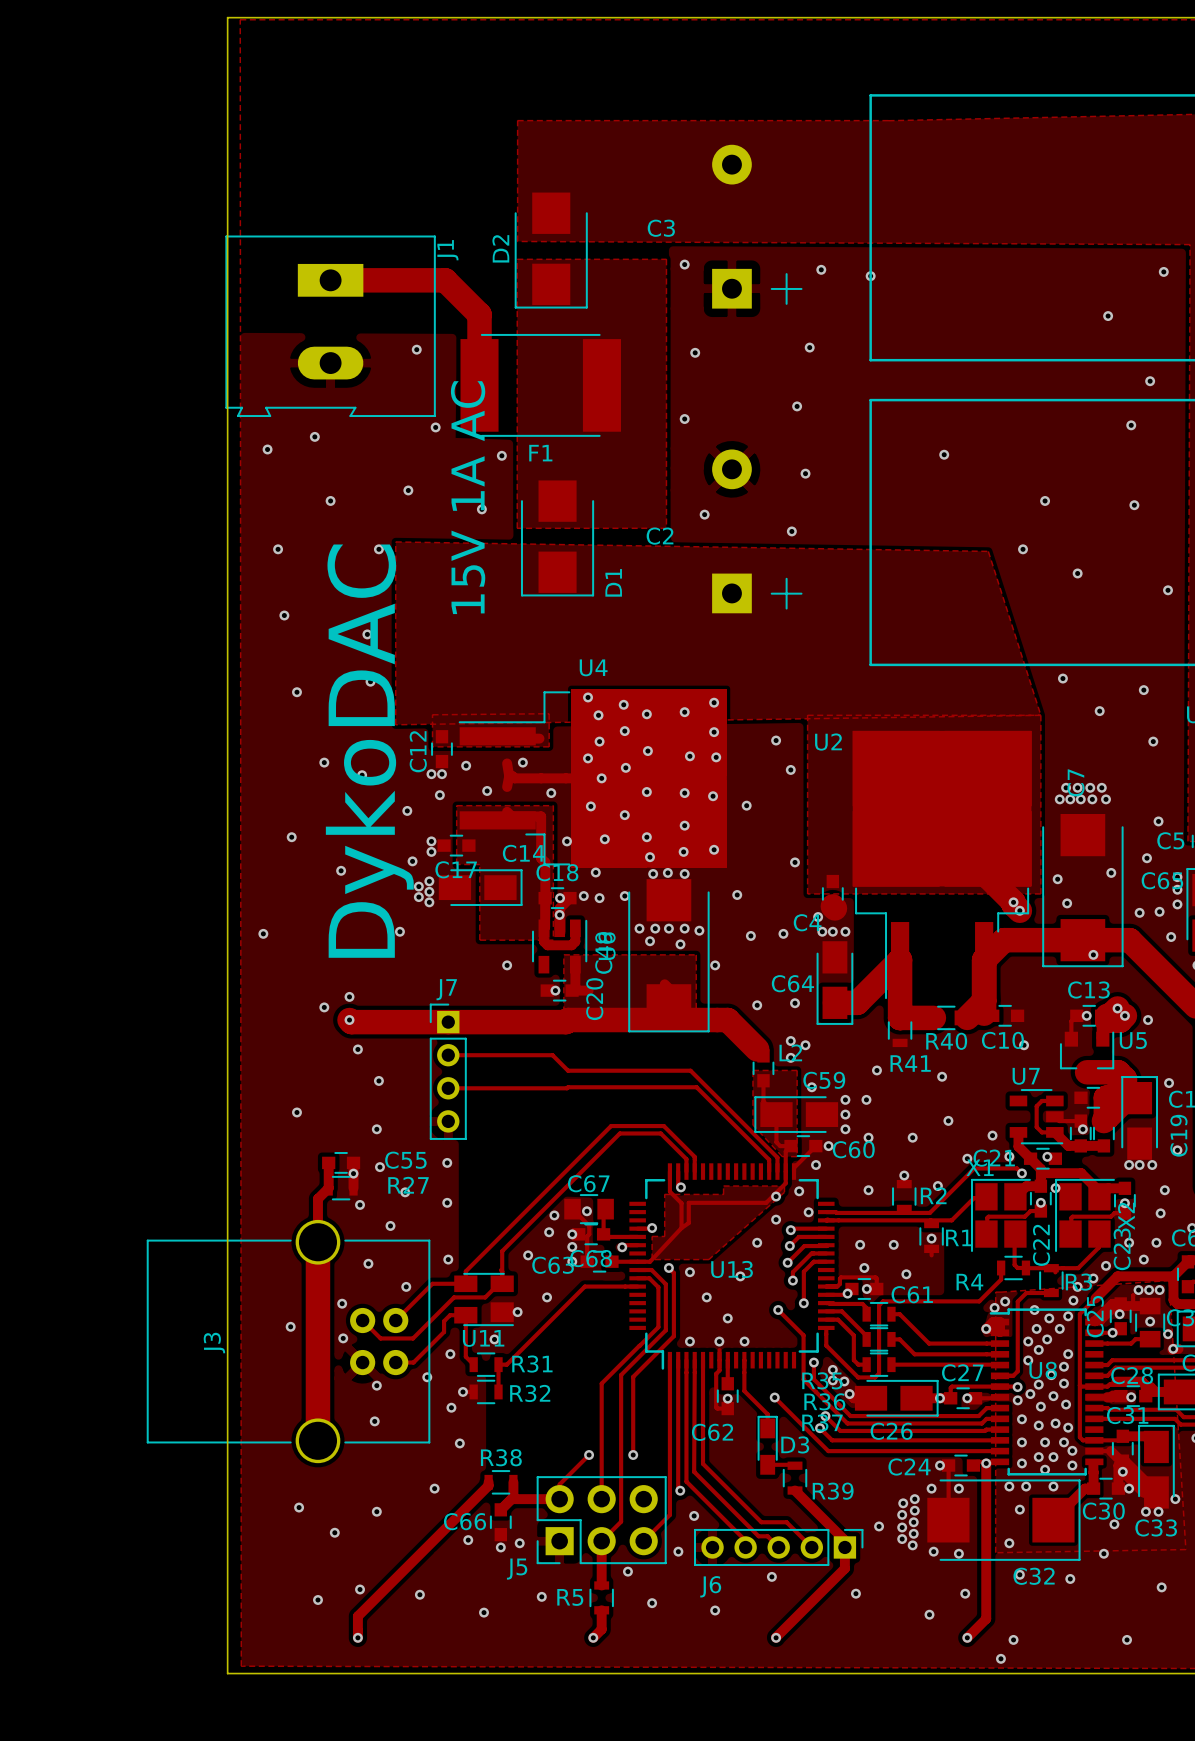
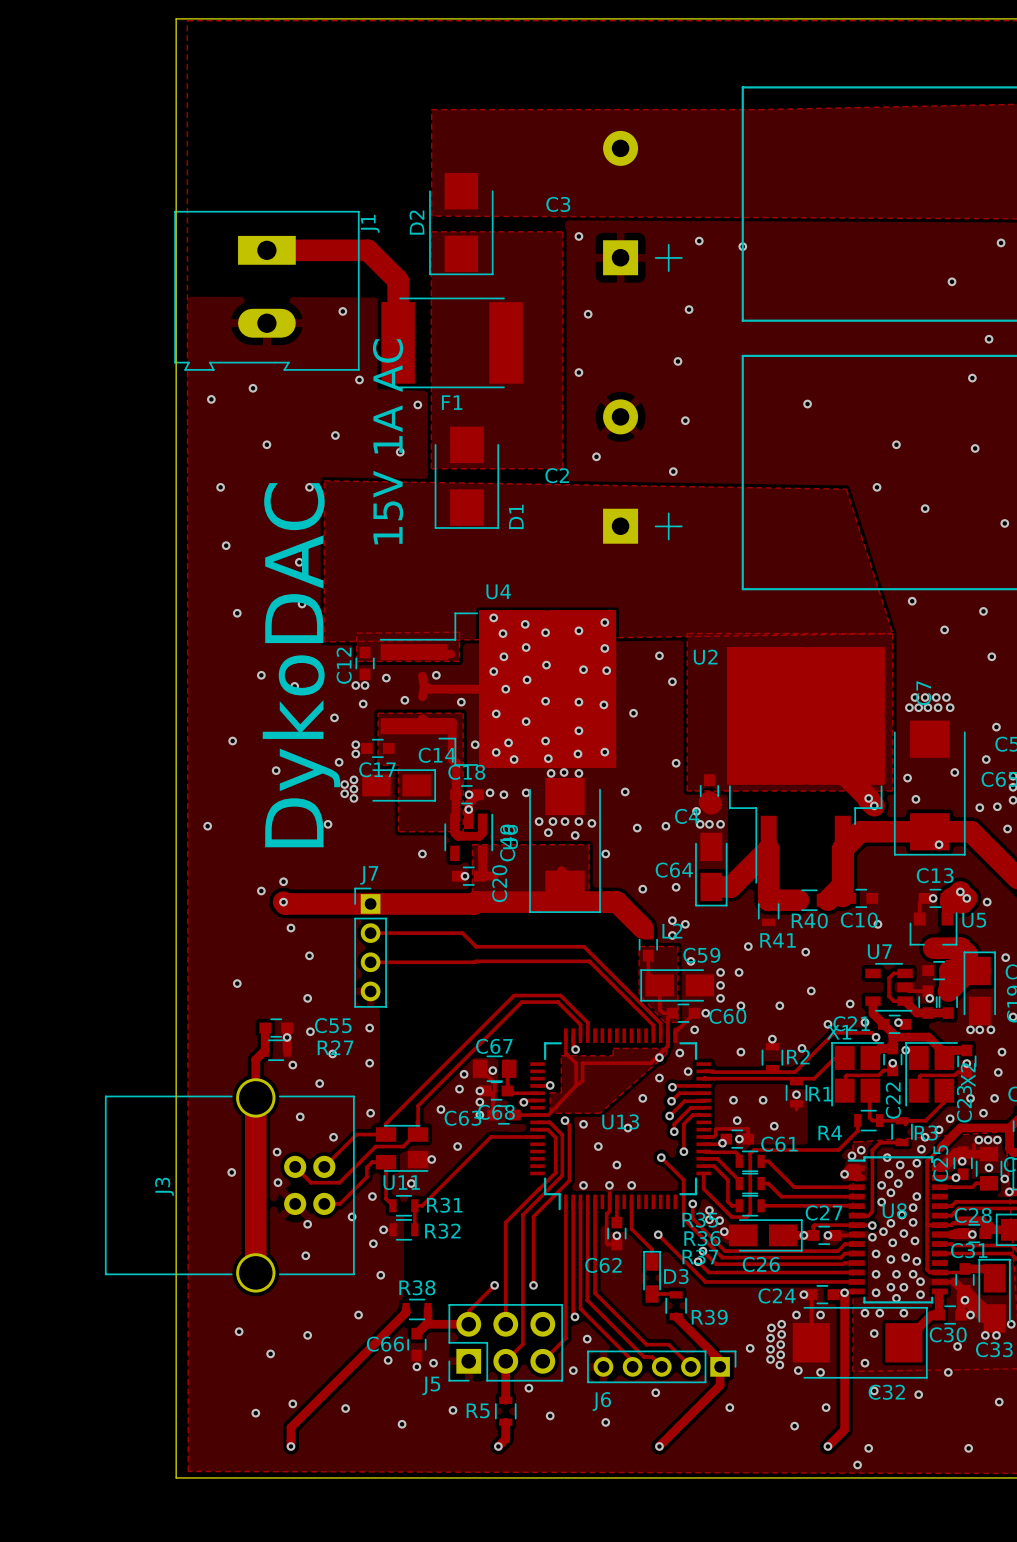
via: none -> (496, 752)
via: none -> (514, 759)
via: (595, 872) -> none

